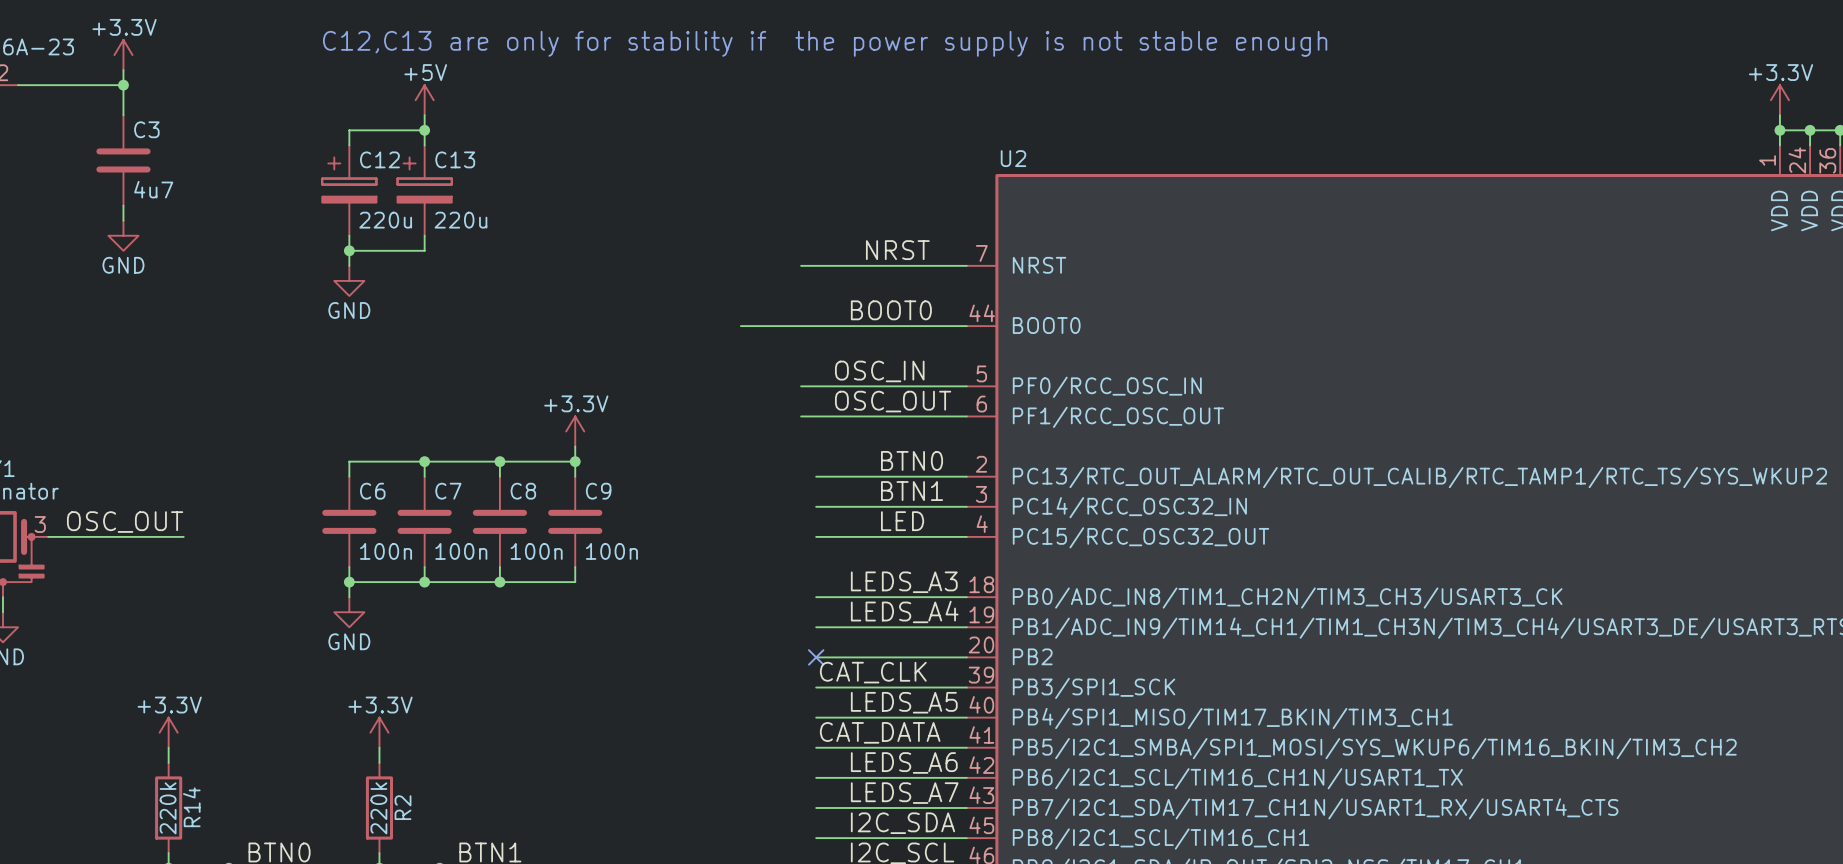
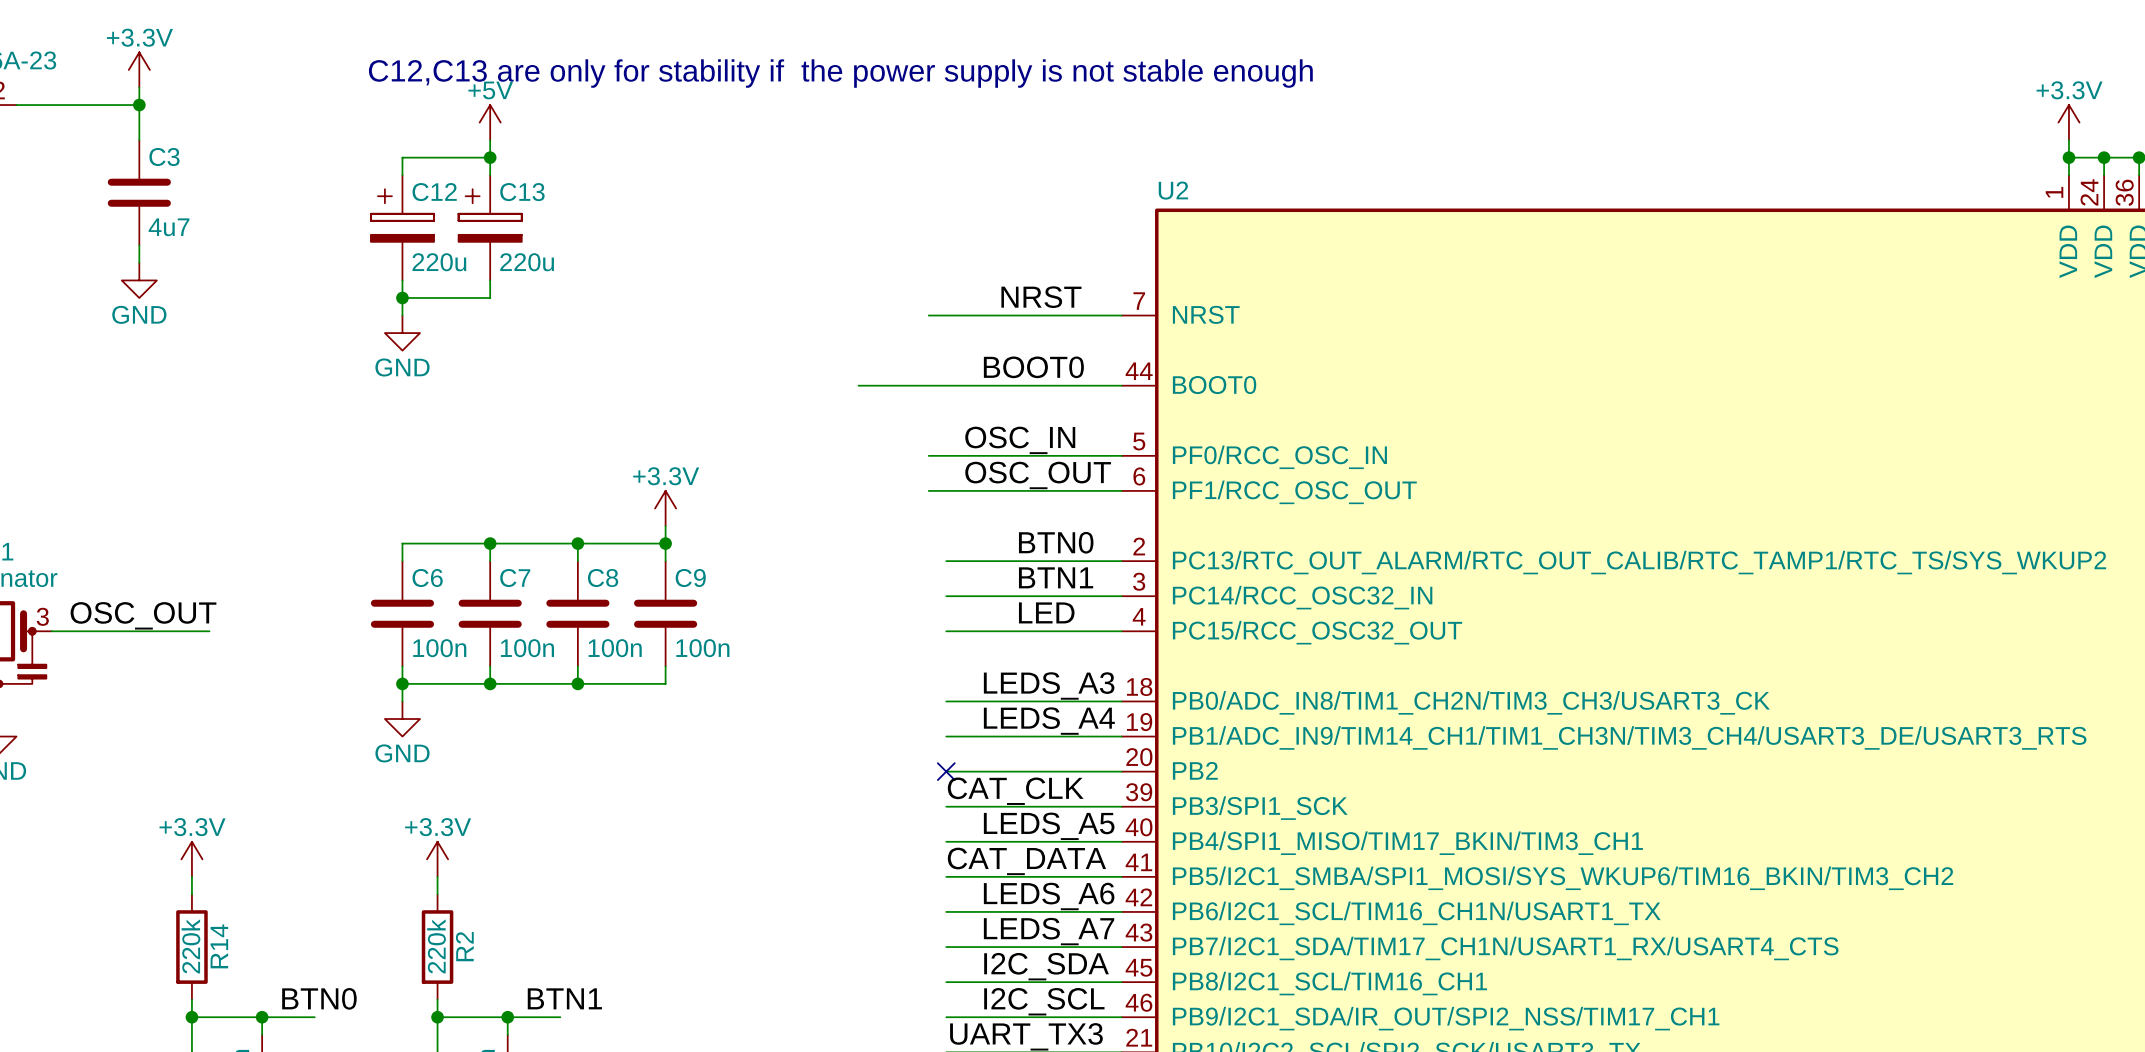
text position: C12,C13 are only for stability if the power supply is not stable enough (825, 43) -> C12,C13 are only for stability if the power supply is not stable enough (840, 73)

